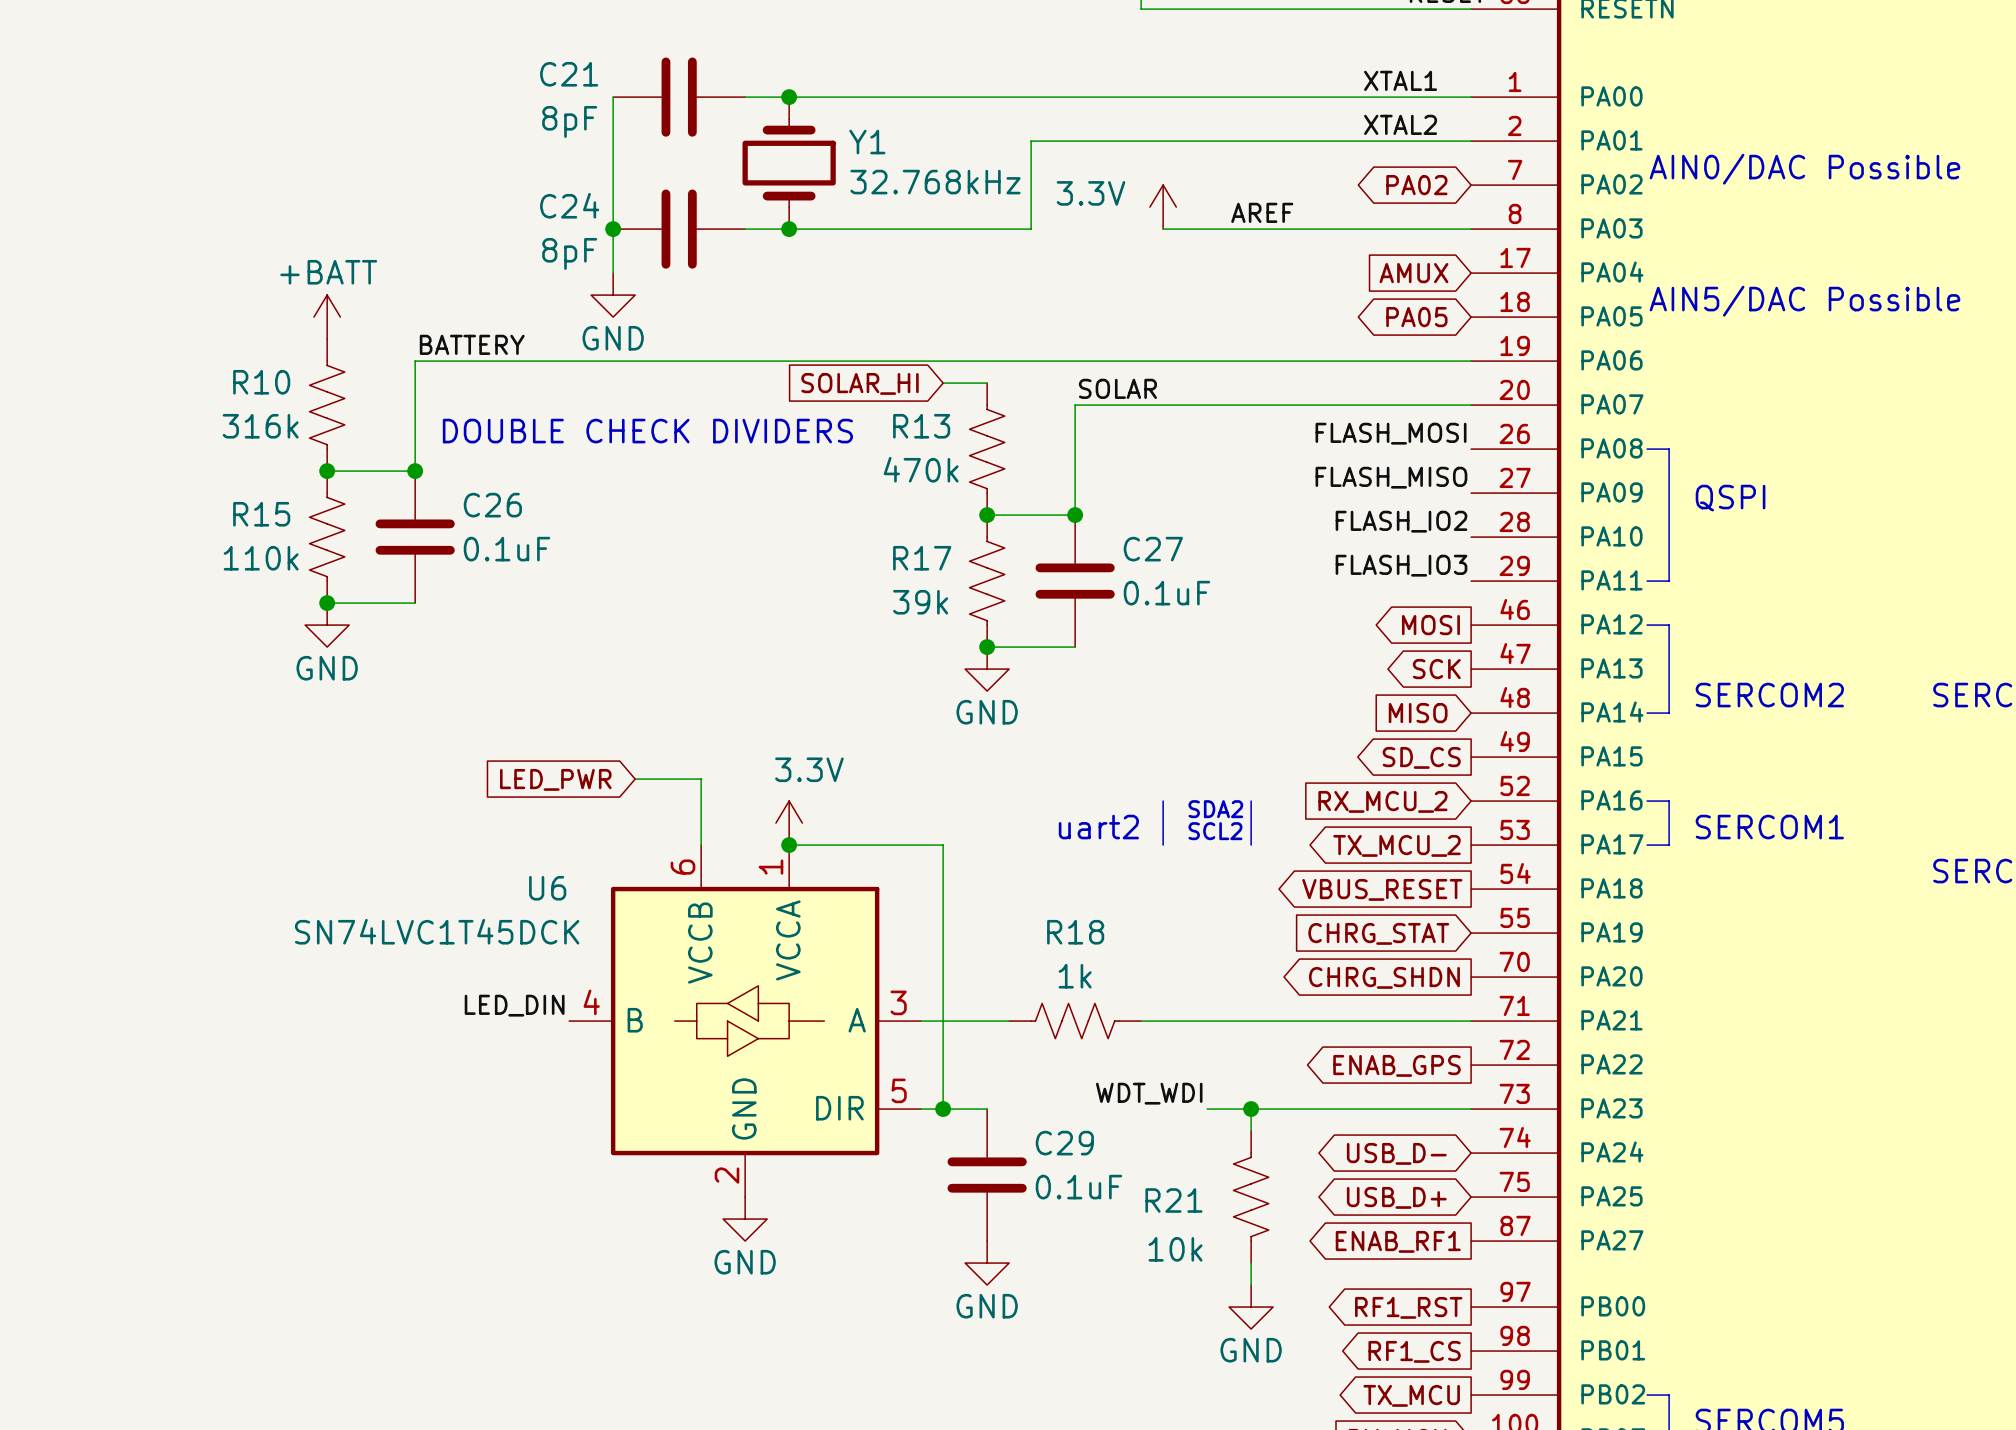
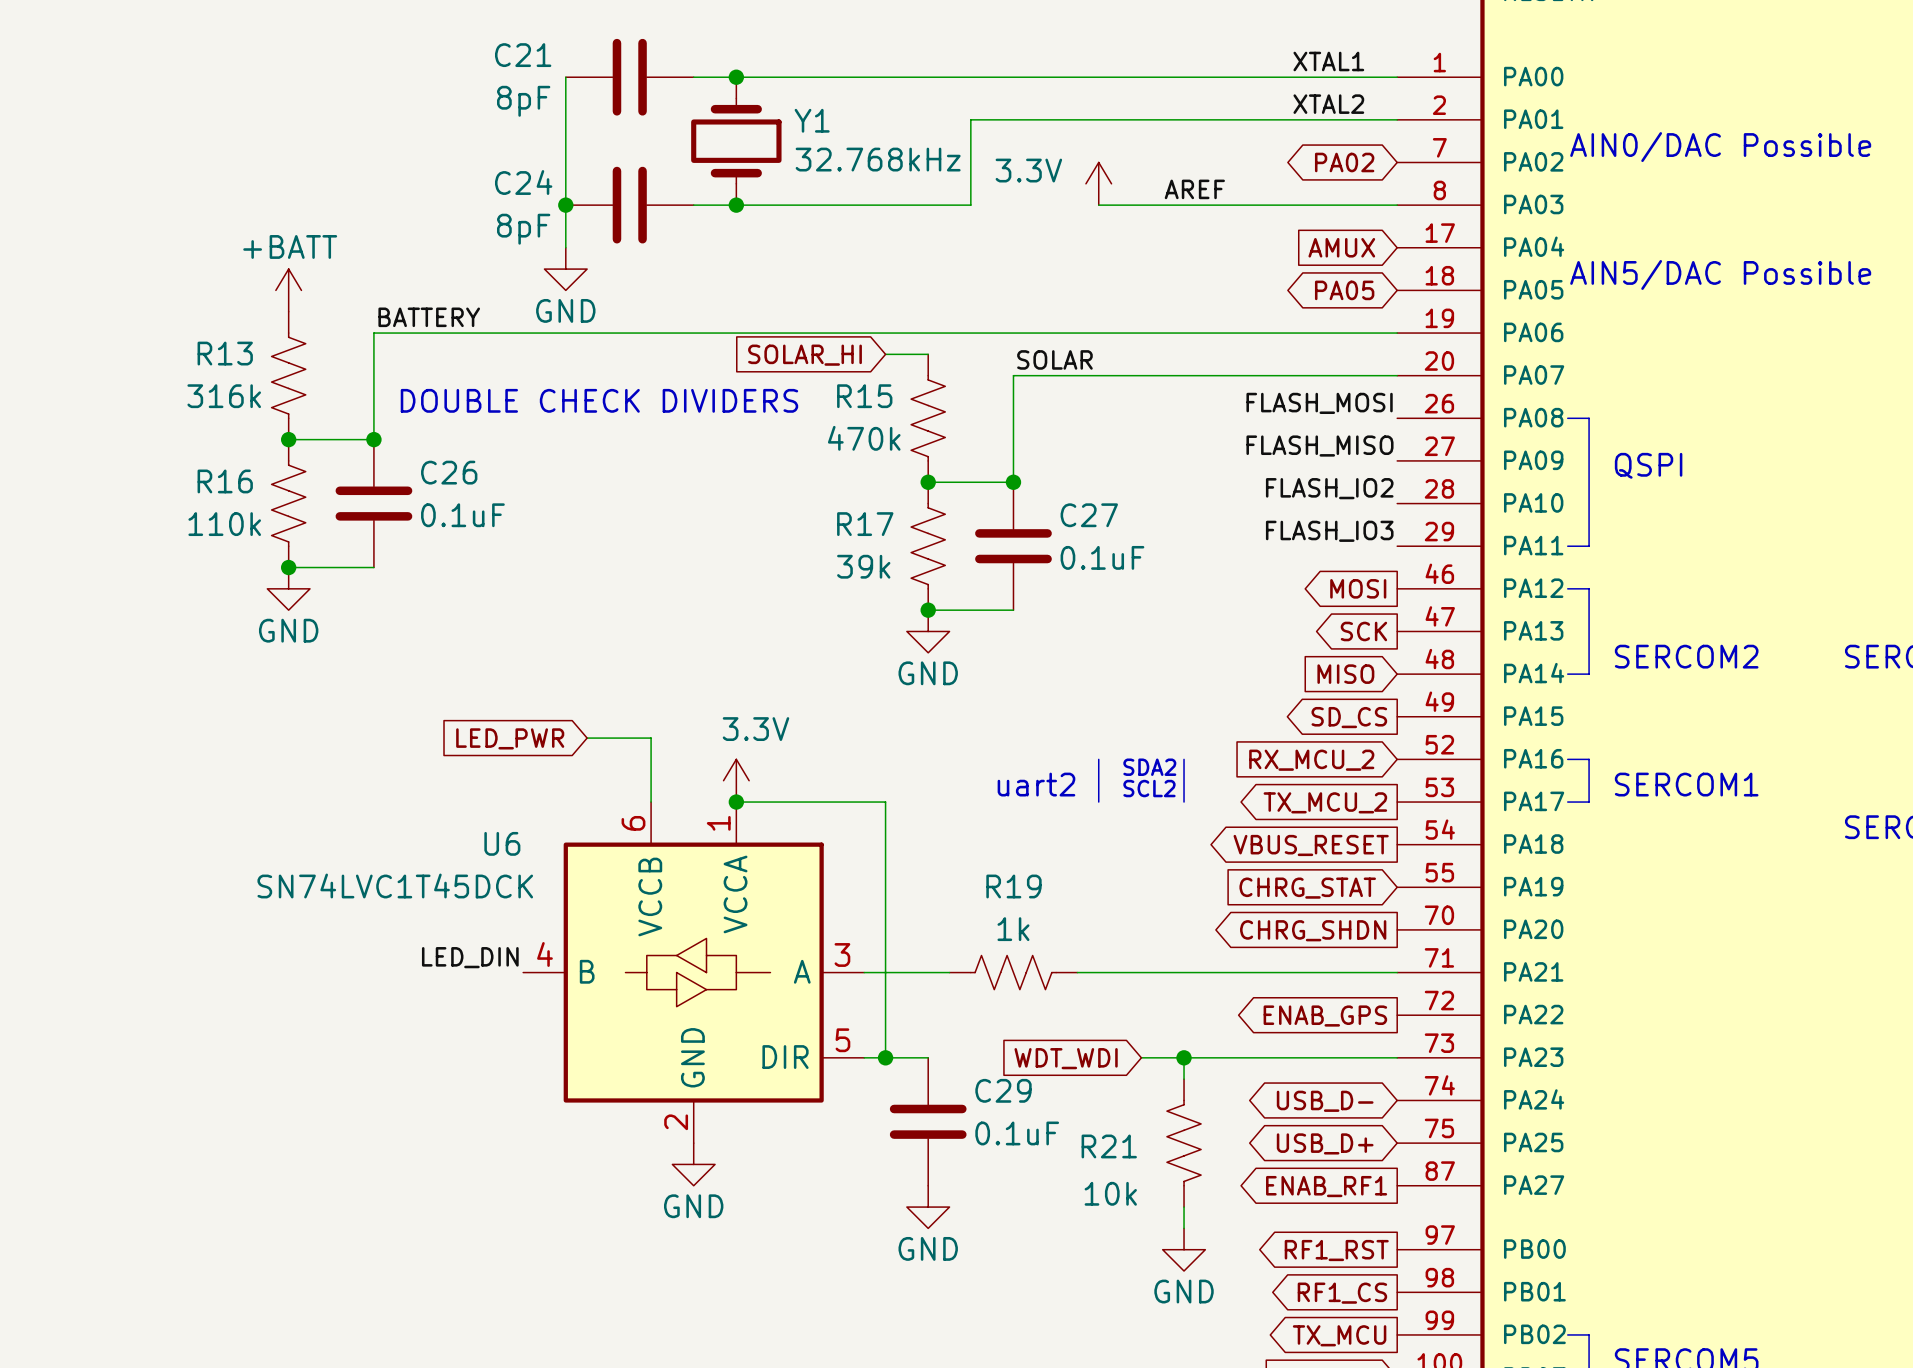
R10 name: R10 (261, 382) -> R13 (225, 353)
R13 name: R13 (921, 426) -> R15 (864, 396)
R15 name: R15 (261, 514) -> R16 (225, 481)
R18 name: R18 (1075, 932) -> R19 (1013, 886)
label: WDT_WDI (1149, 1093) -> none
global label: none -> WDT_WDI (1066, 1058)

